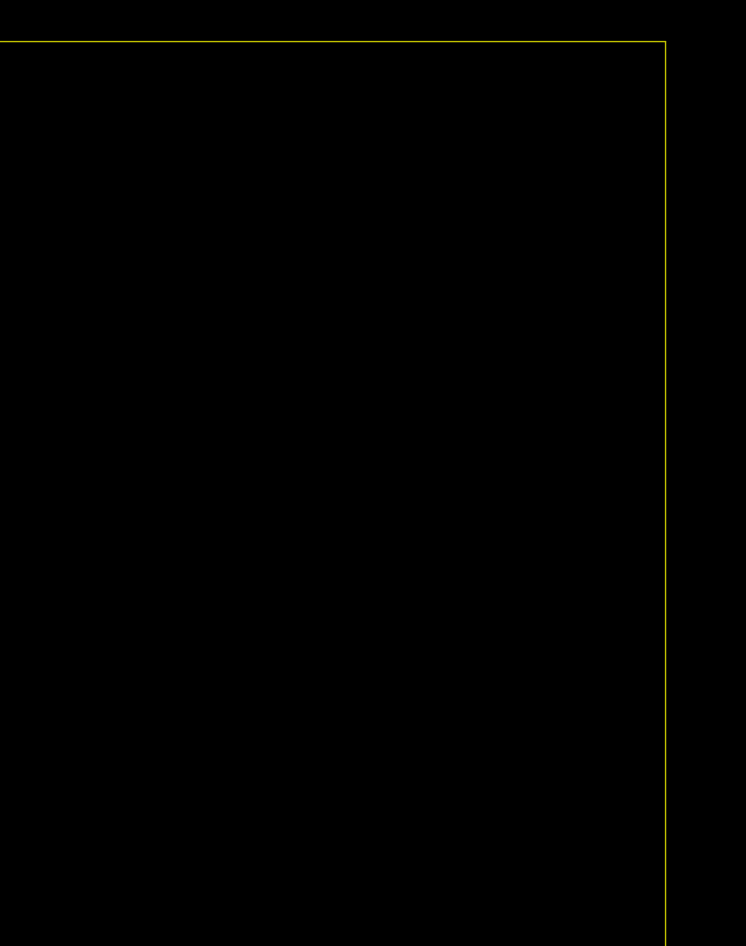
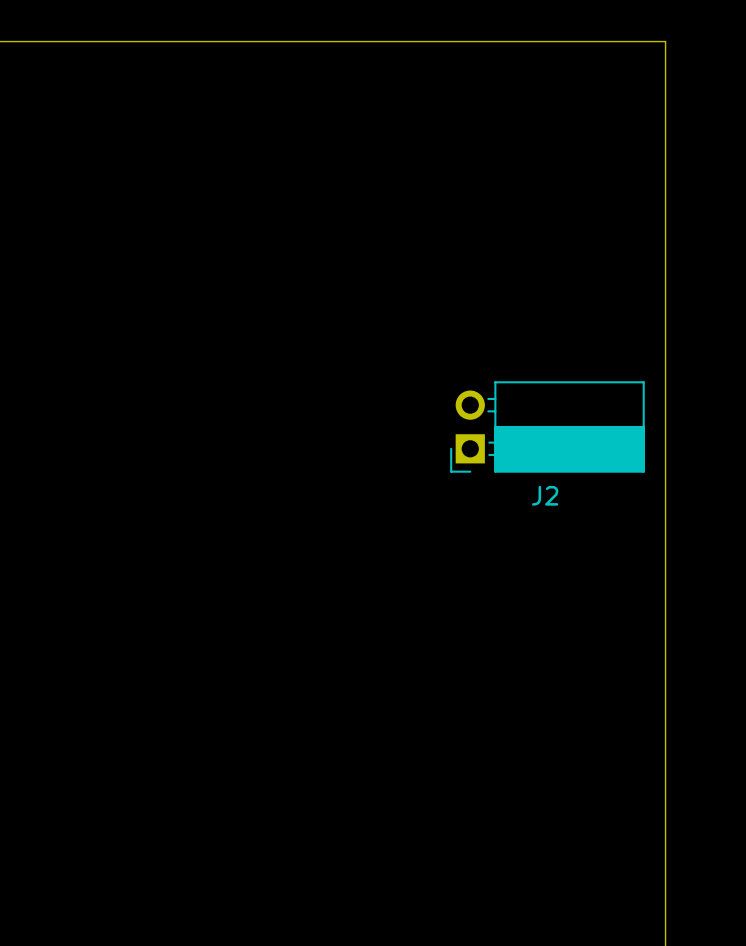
J2: none -> (547, 426)

